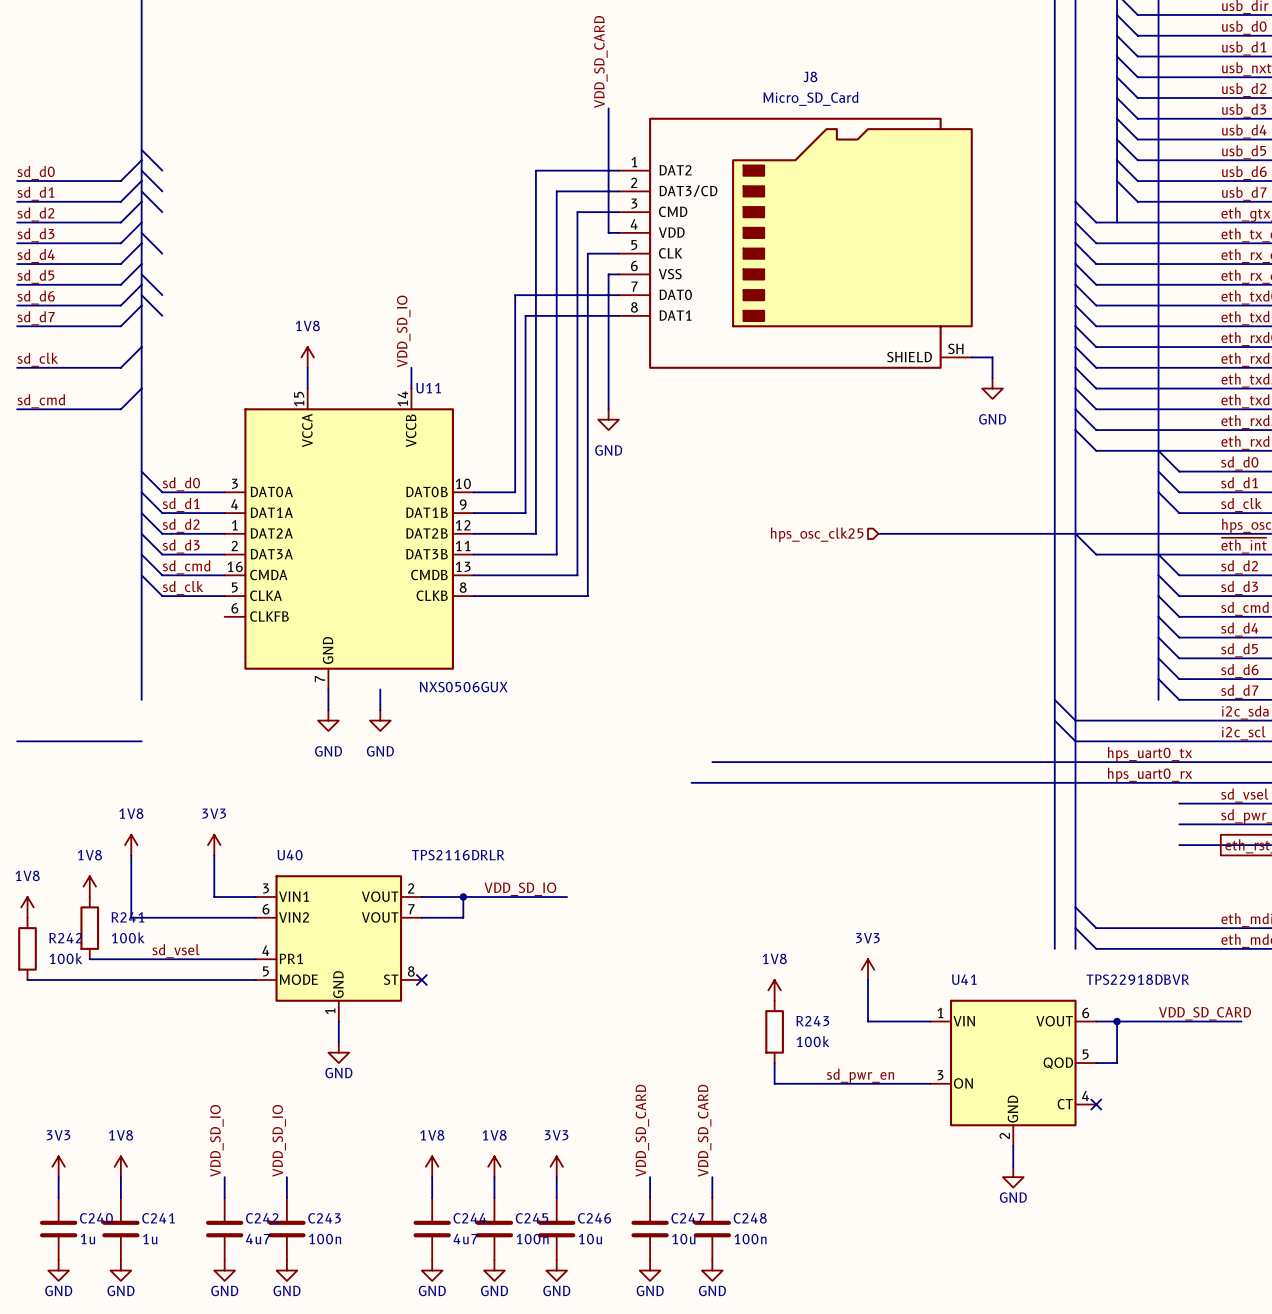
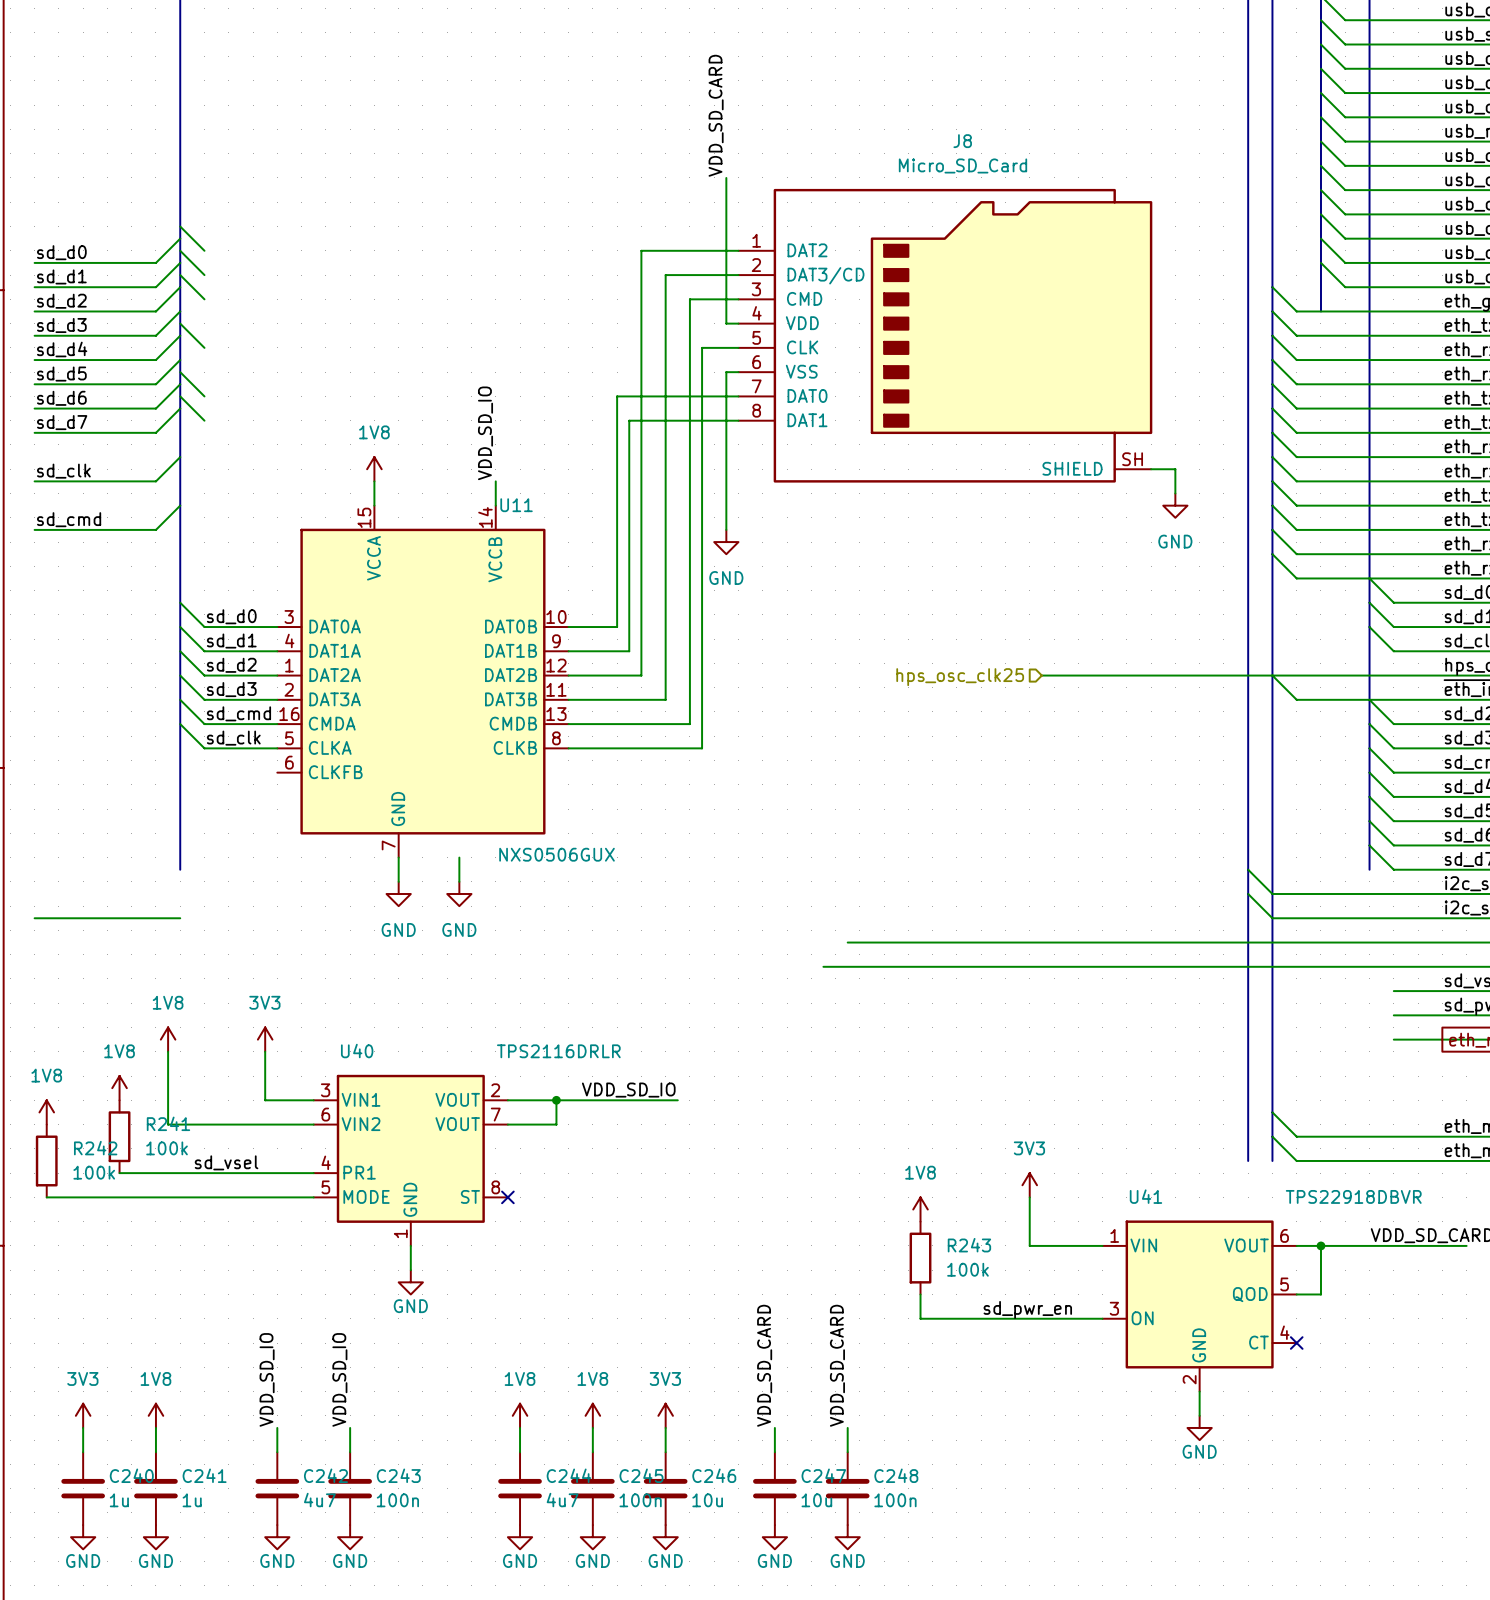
label: hps_uart0_tx (1150, 754) -> none
label: hps_uart0_rx (1150, 774) -> none

